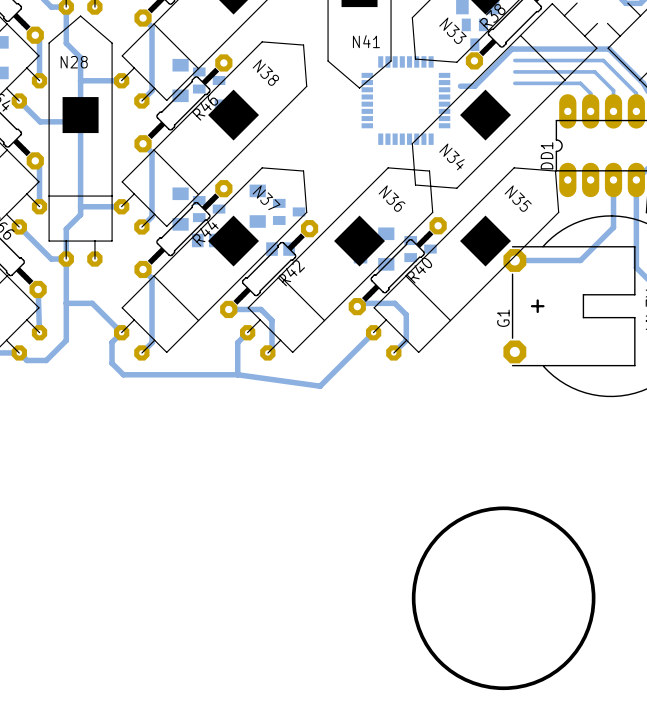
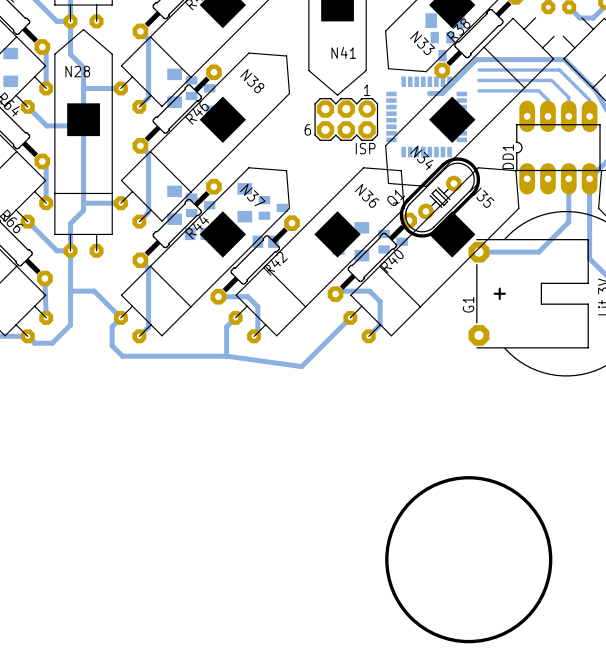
part position: (405, 100) -> (426, 116)
ISP: none -> (346, 119)
Q1: none -> (439, 197)

